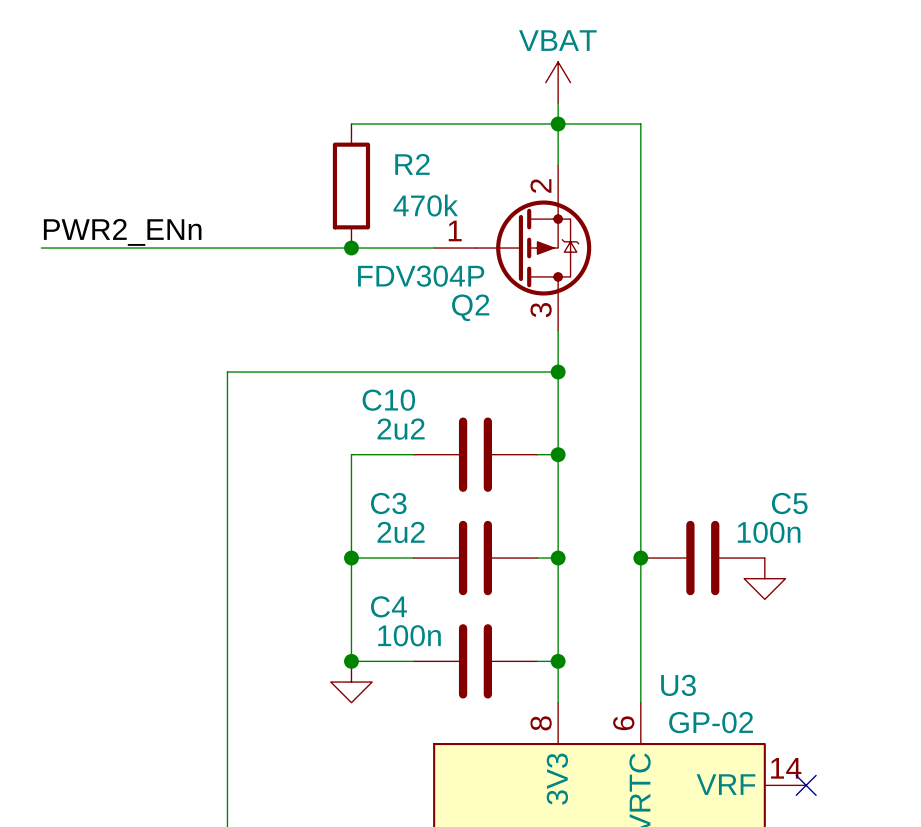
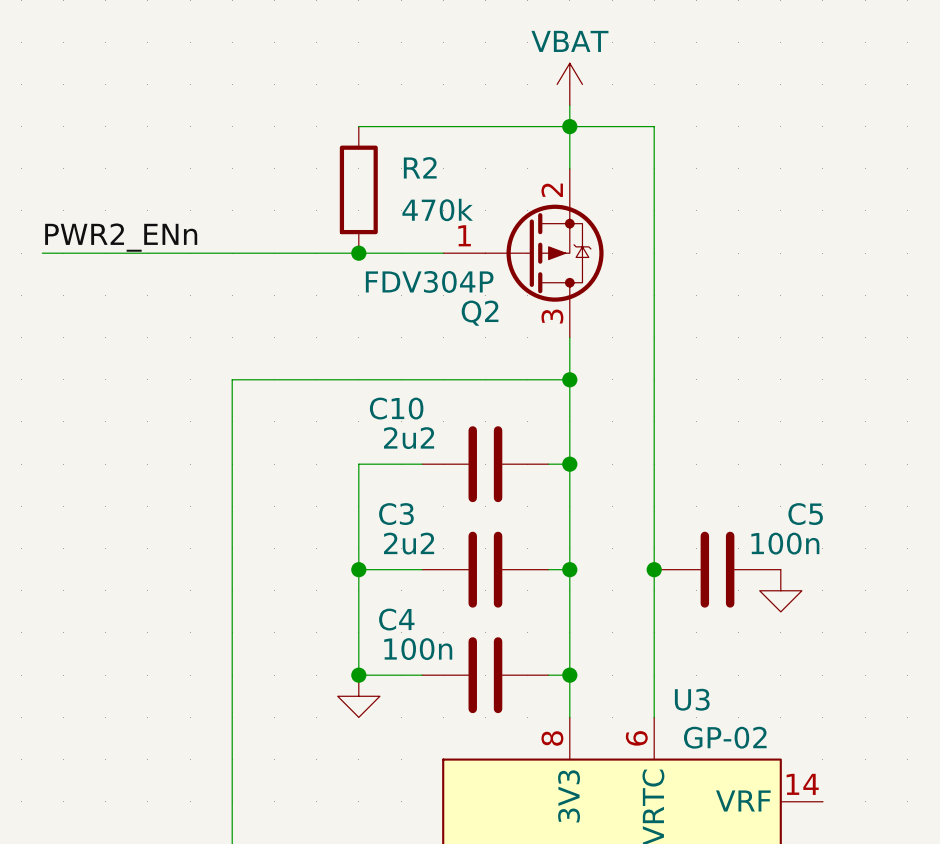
no-connect mark: (806, 785) -> none

